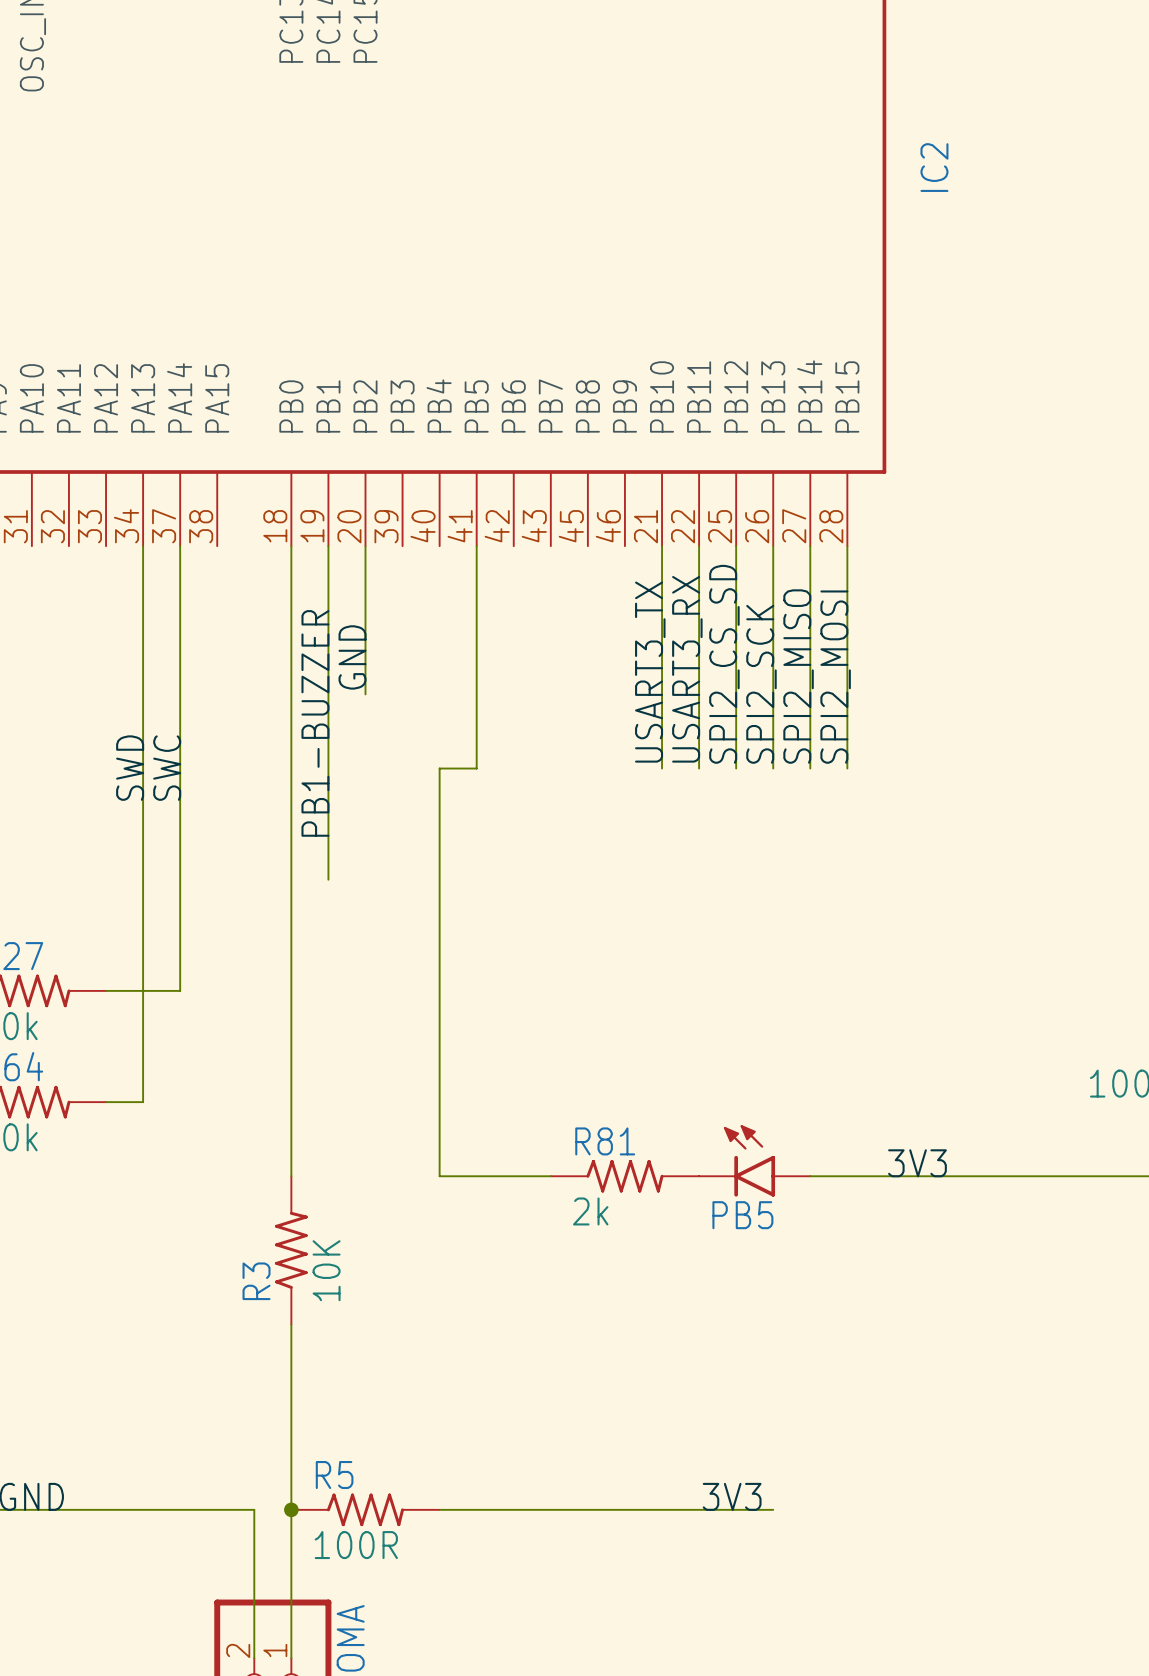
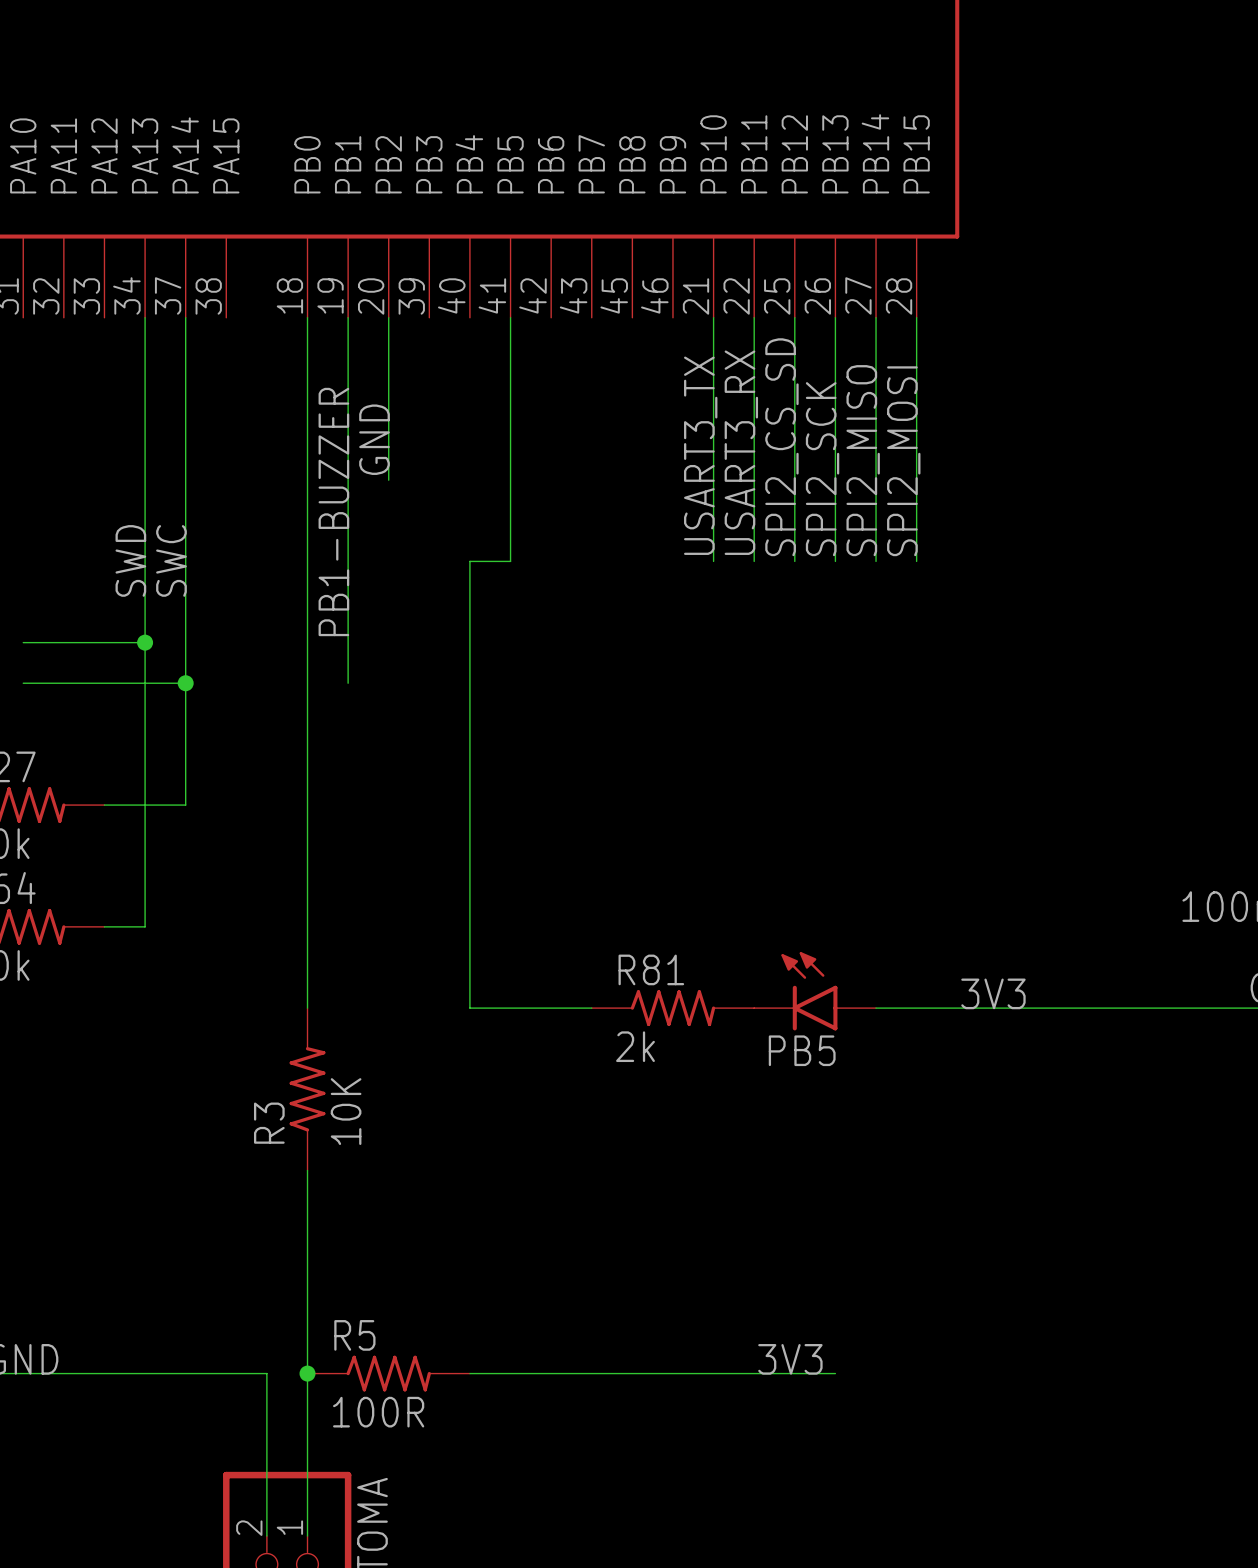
wire: none -> (23, 642) (145, 642)
junction: none -> (145, 642)
wire: none -> (23, 683) (185, 683)
junction: none -> (185, 683)

